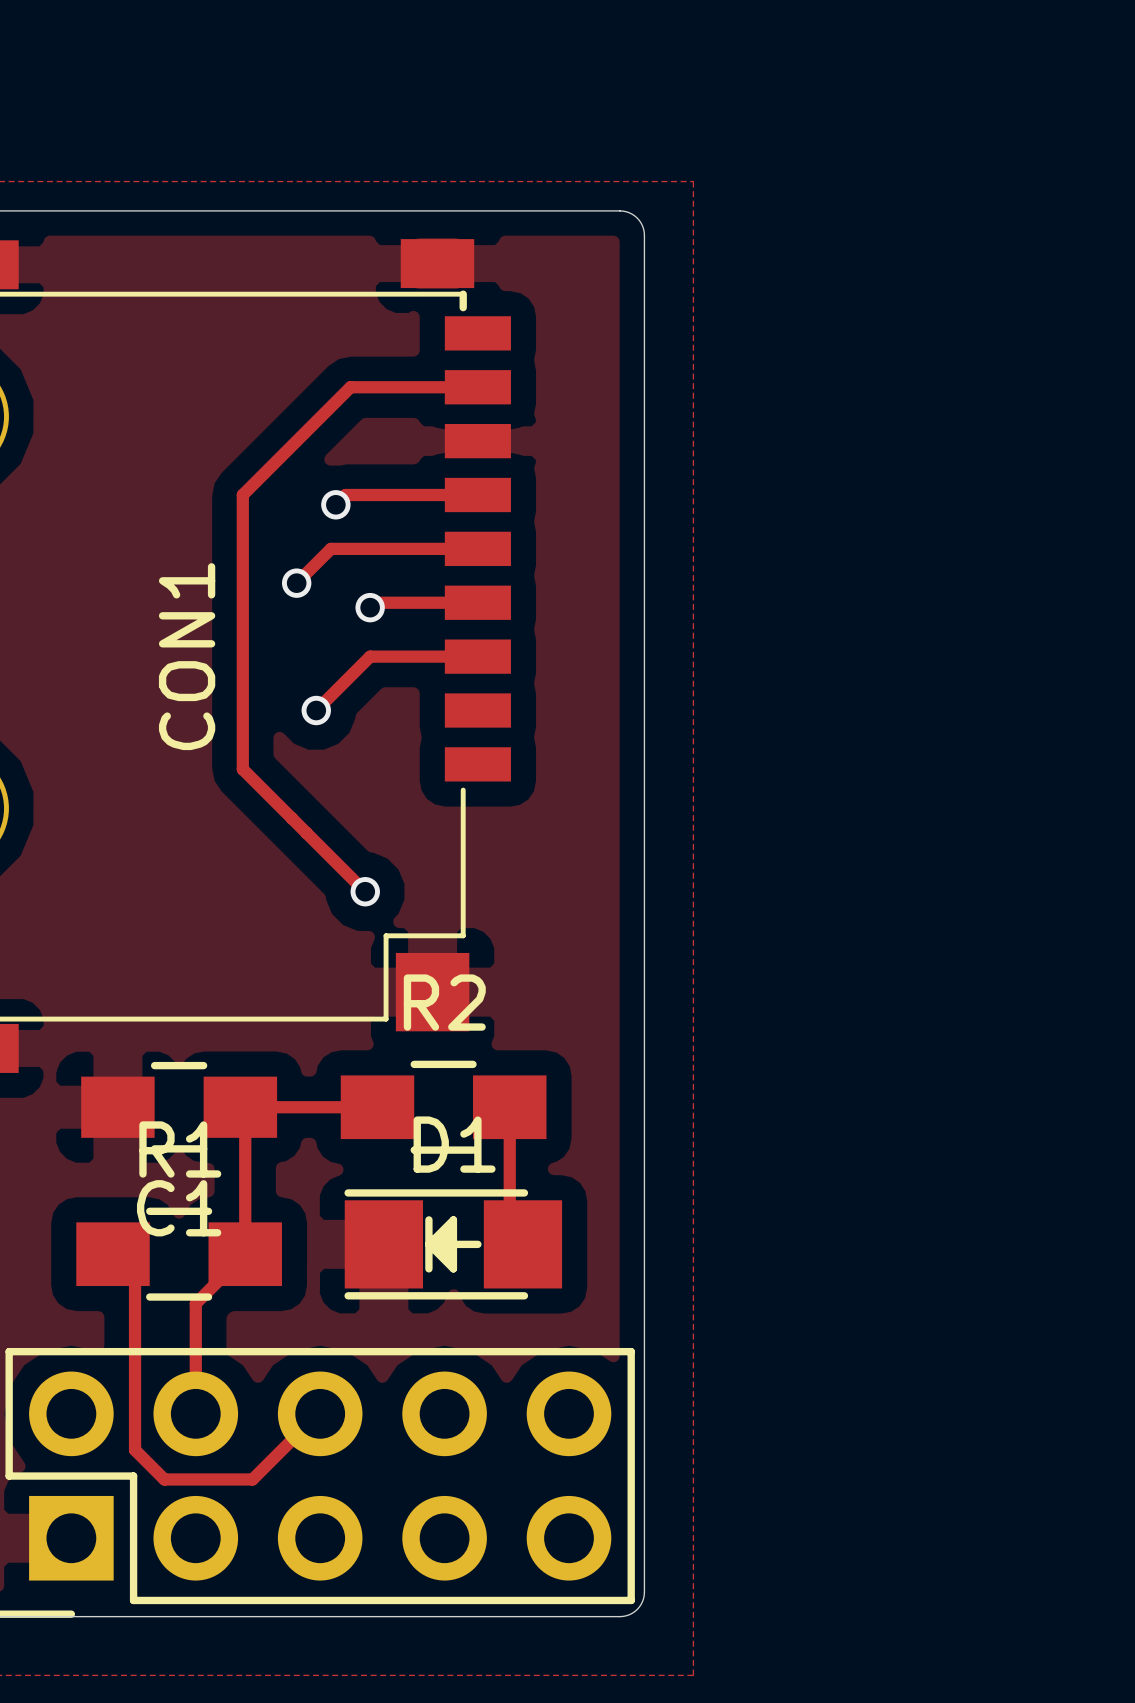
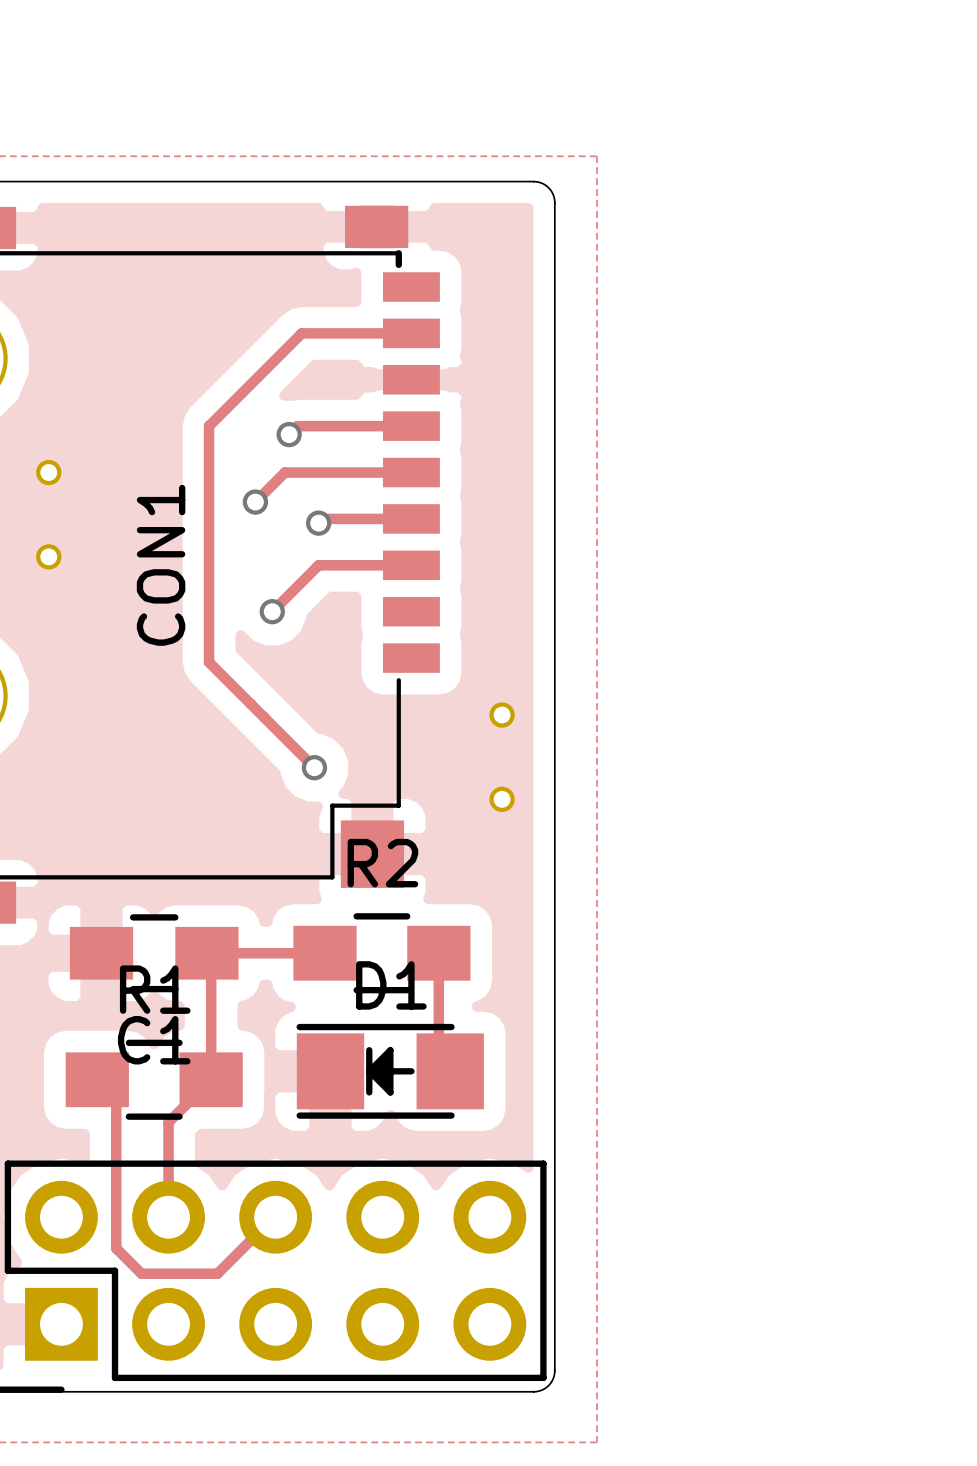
part: none -> (48, 472)
part: none -> (48, 556)
part: none -> (502, 715)
part: none -> (502, 799)

